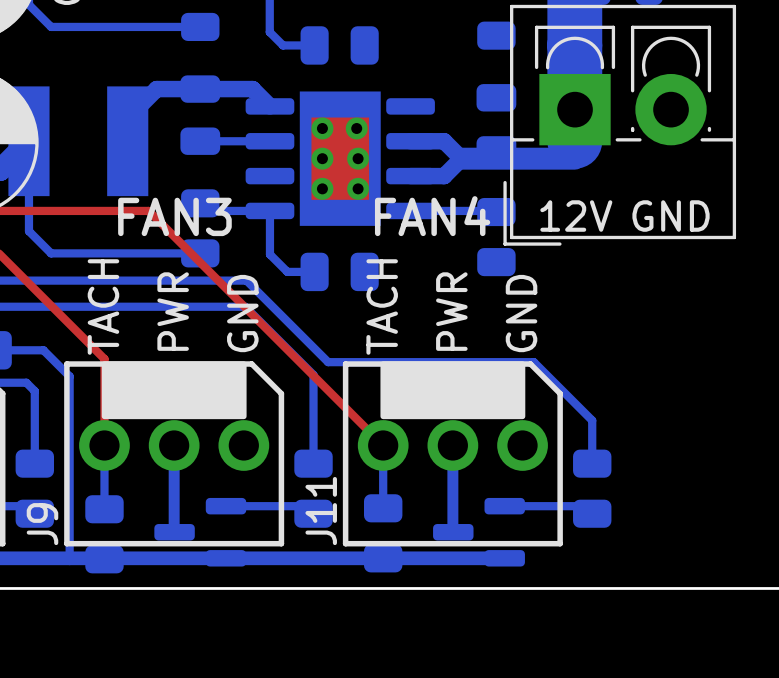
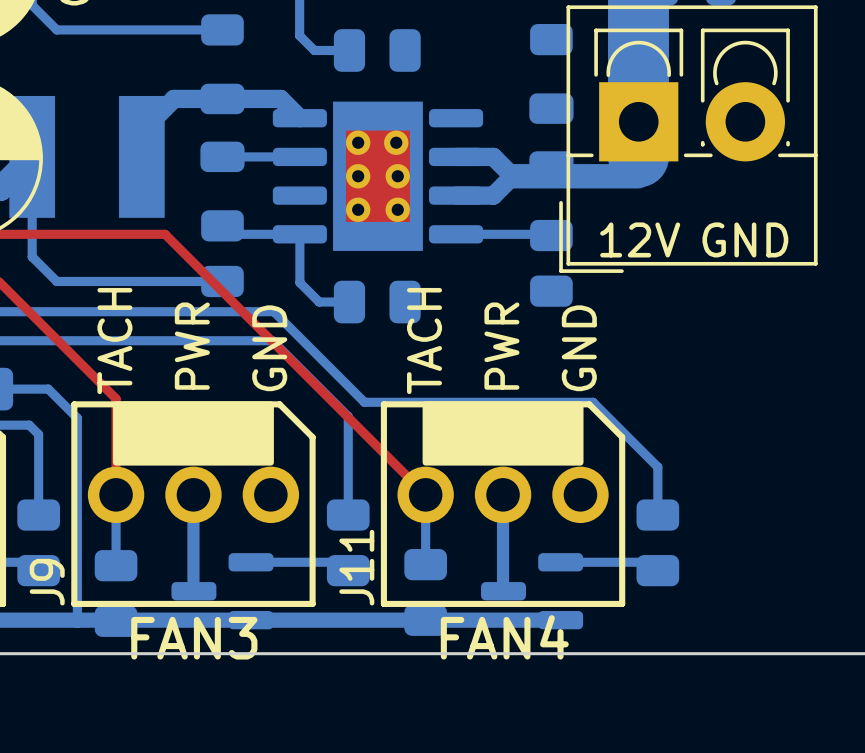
J9 text position: FAN3 (174, 216) -> FAN3 (194, 638)
J11 text position: FAN4 (432, 216) -> FAN4 (504, 637)

